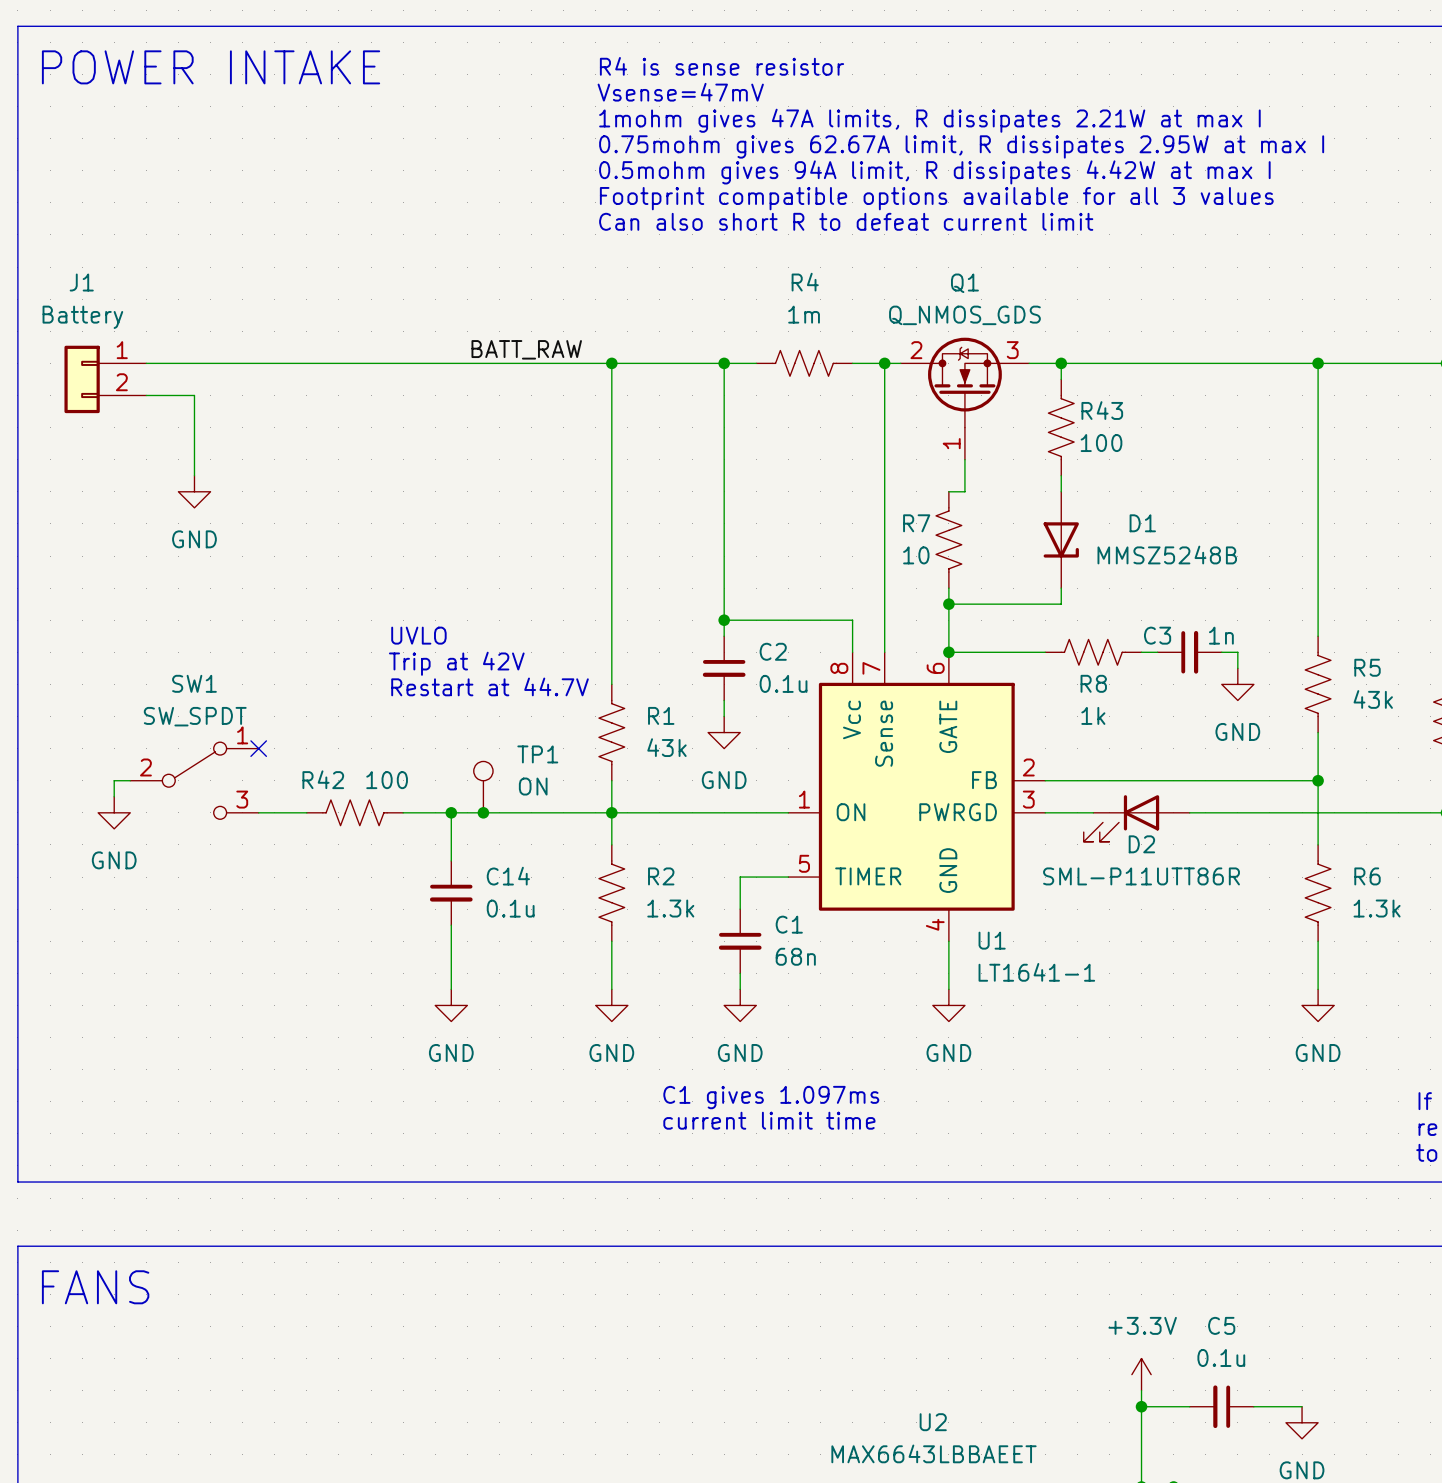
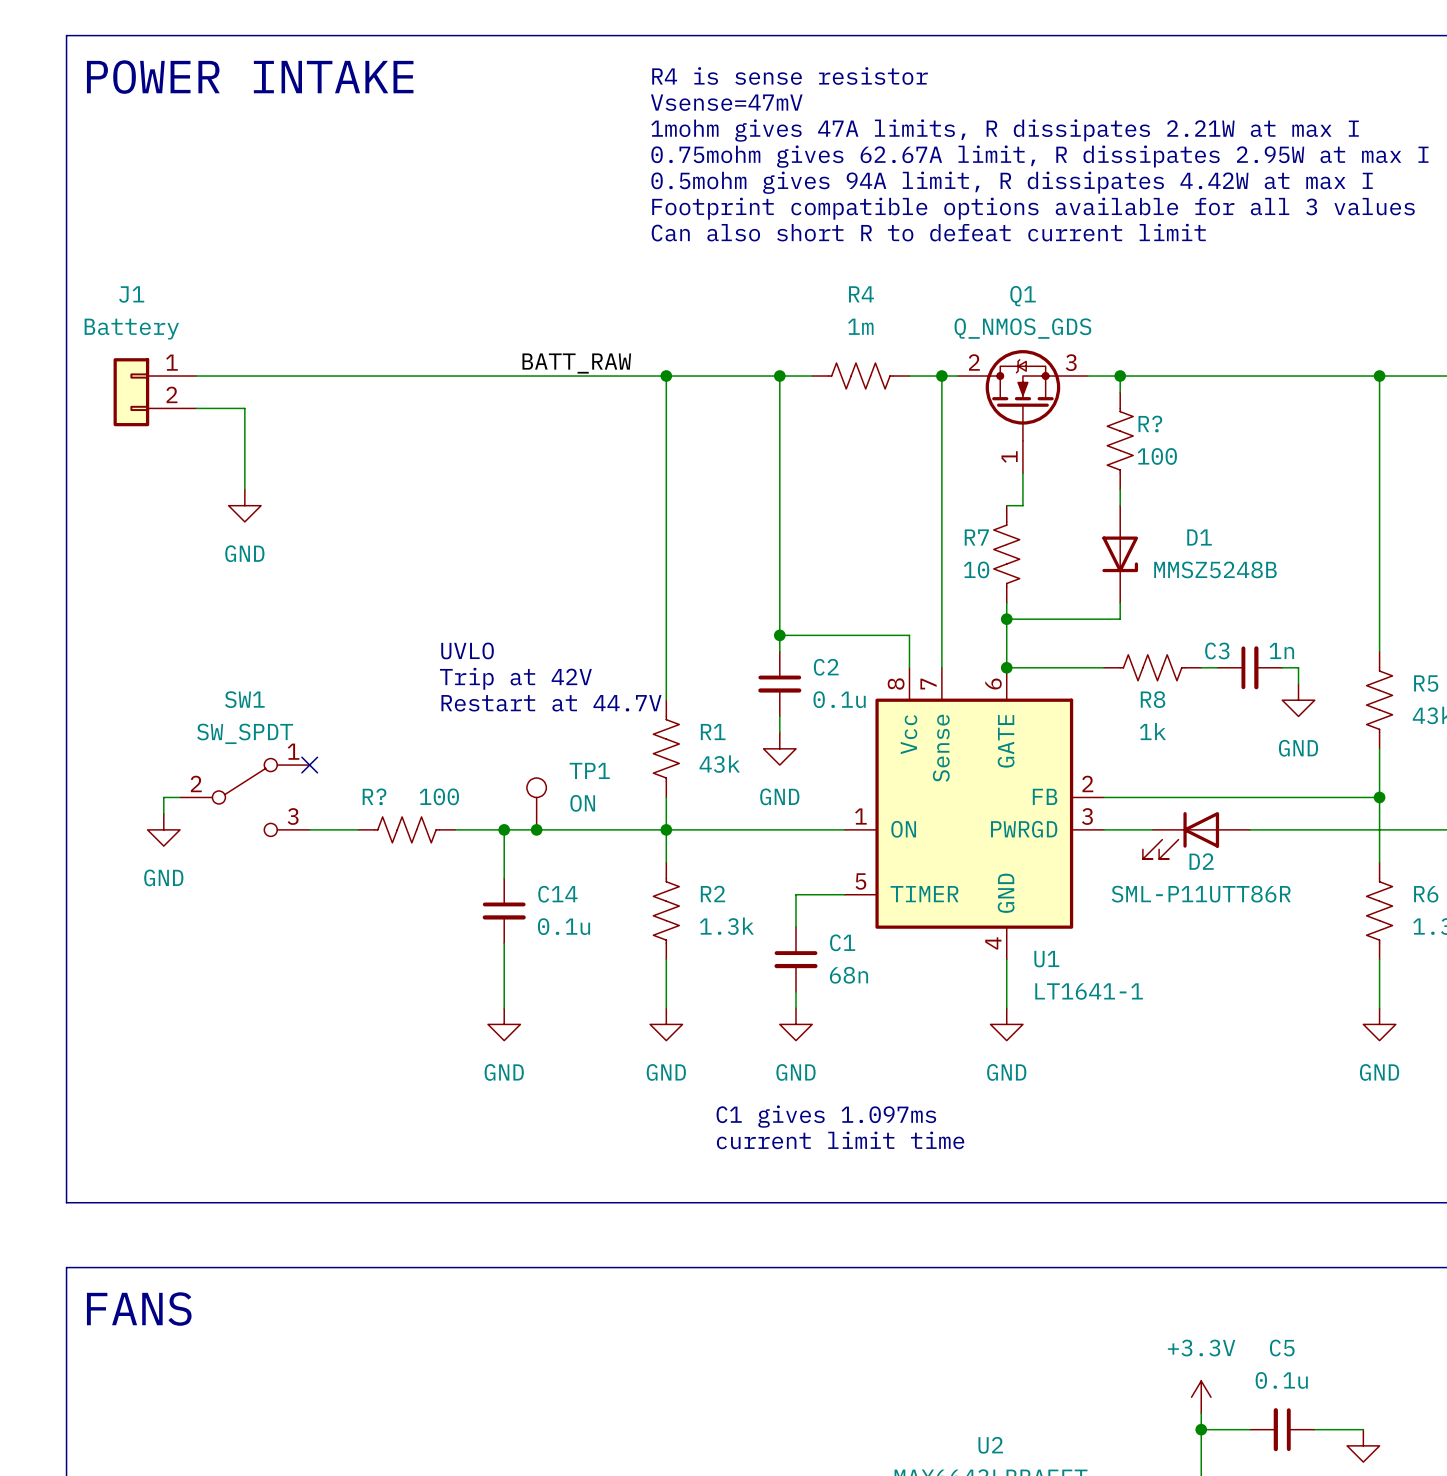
R43 name: R43 (1102, 410) -> R? (1150, 424)
R42 name: R42 (323, 779) -> R? (374, 796)

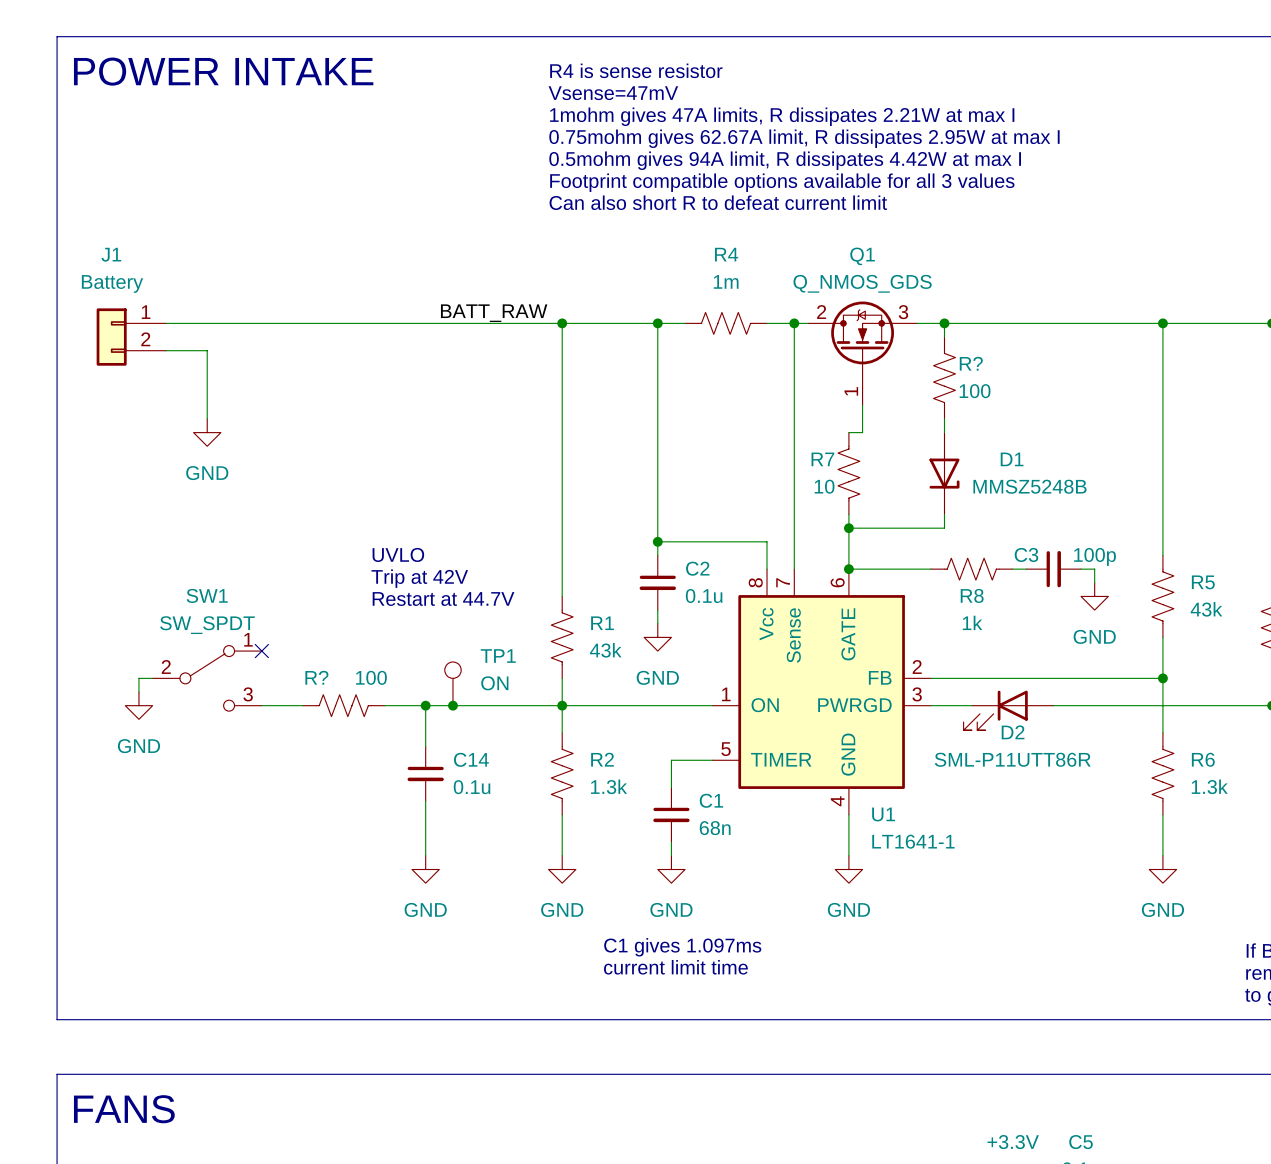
C3 value: 1n (1281, 650) -> 100p (1095, 556)

